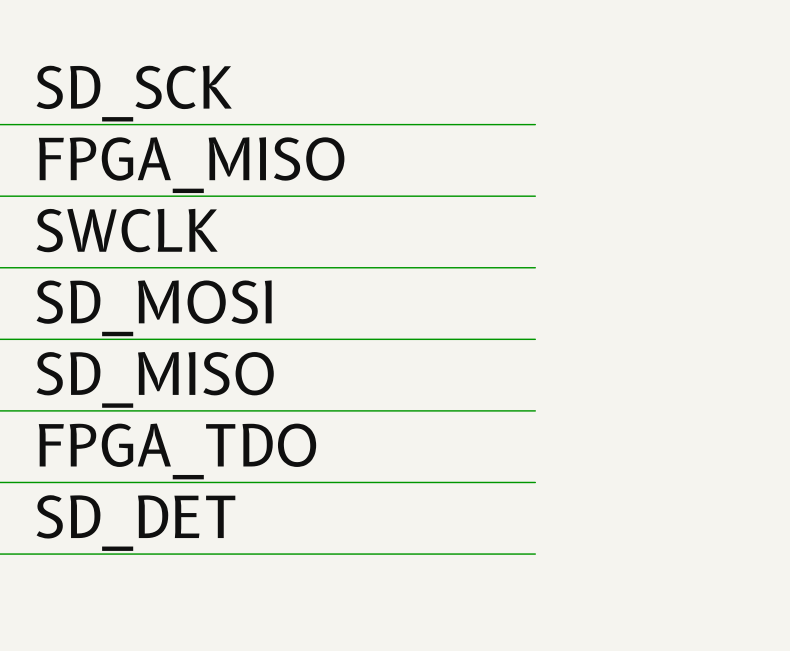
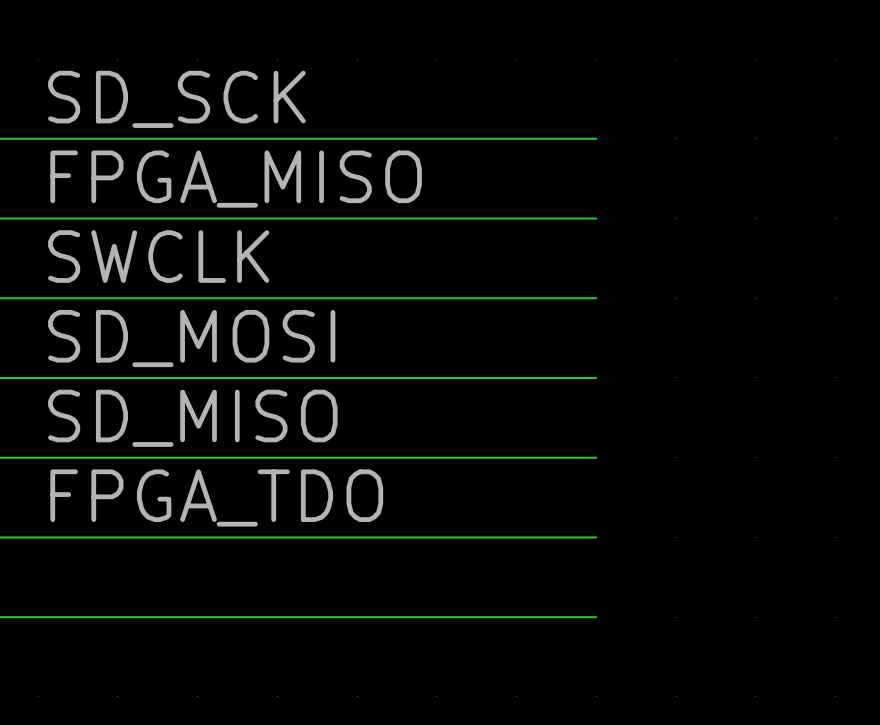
label: SD_DET (135, 523) -> none

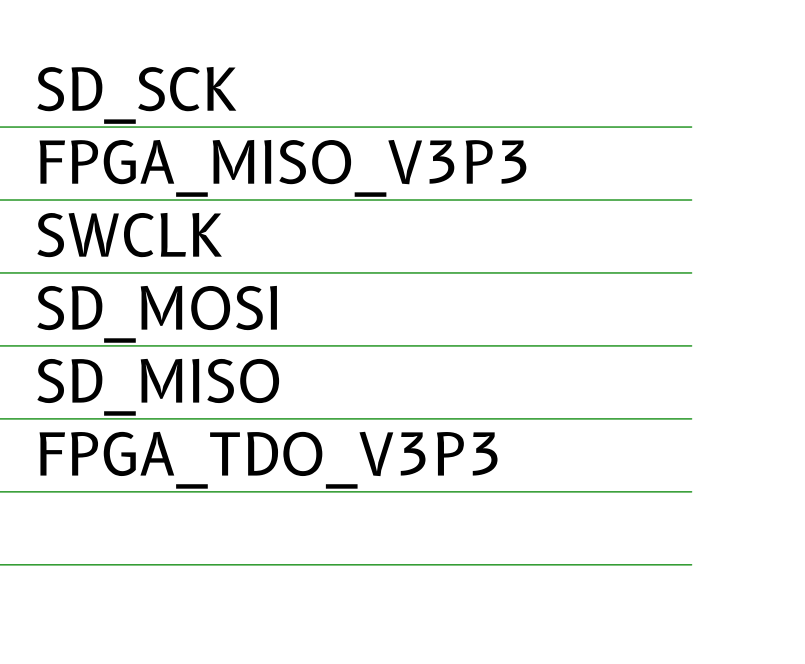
wire: none -> (545, 127) (691, 127)
label: FPGA_MISO (236, 179) -> FPGA_MISO_V3P3 (282, 168)
wire: none -> (545, 200) (691, 200)
wire: none -> (545, 272) (691, 272)
wire: none -> (545, 345) (691, 345)
wire: none -> (545, 418) (691, 418)
label: FPGA_TDO (216, 497) -> FPGA_TDO_V3P3 (268, 460)
wire: none -> (545, 491) (691, 491)
wire: none -> (545, 564) (691, 564)

